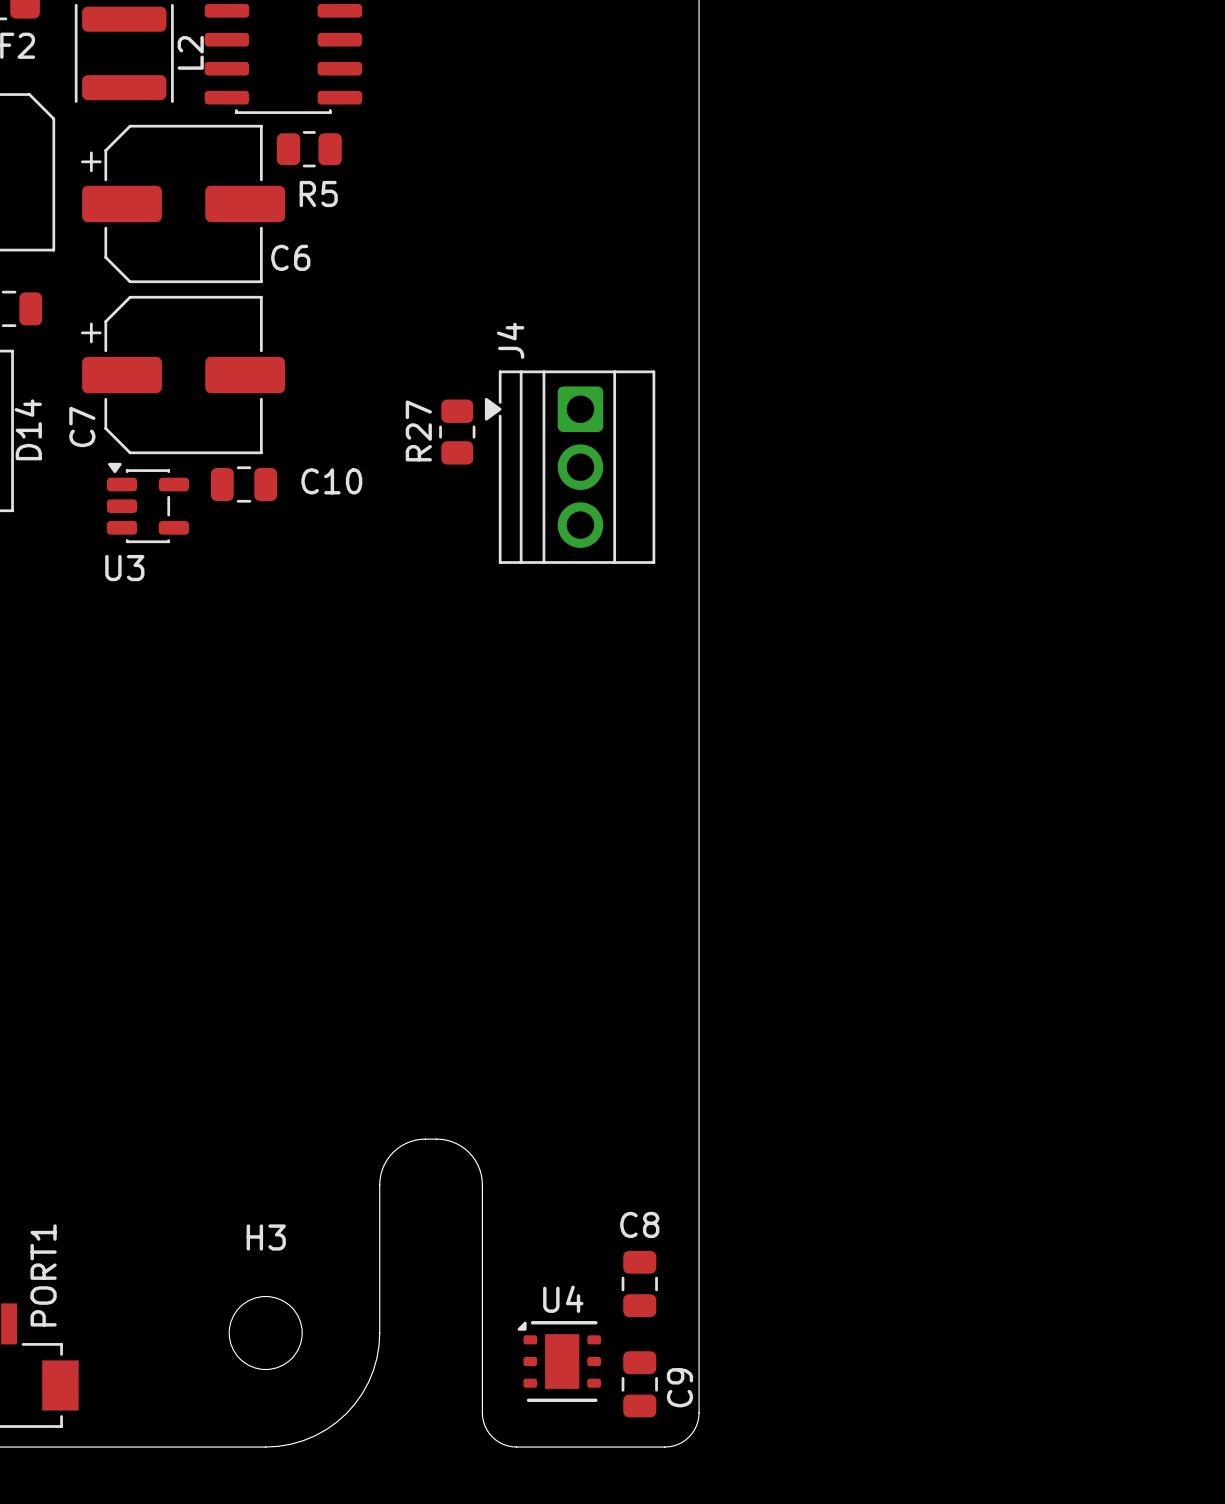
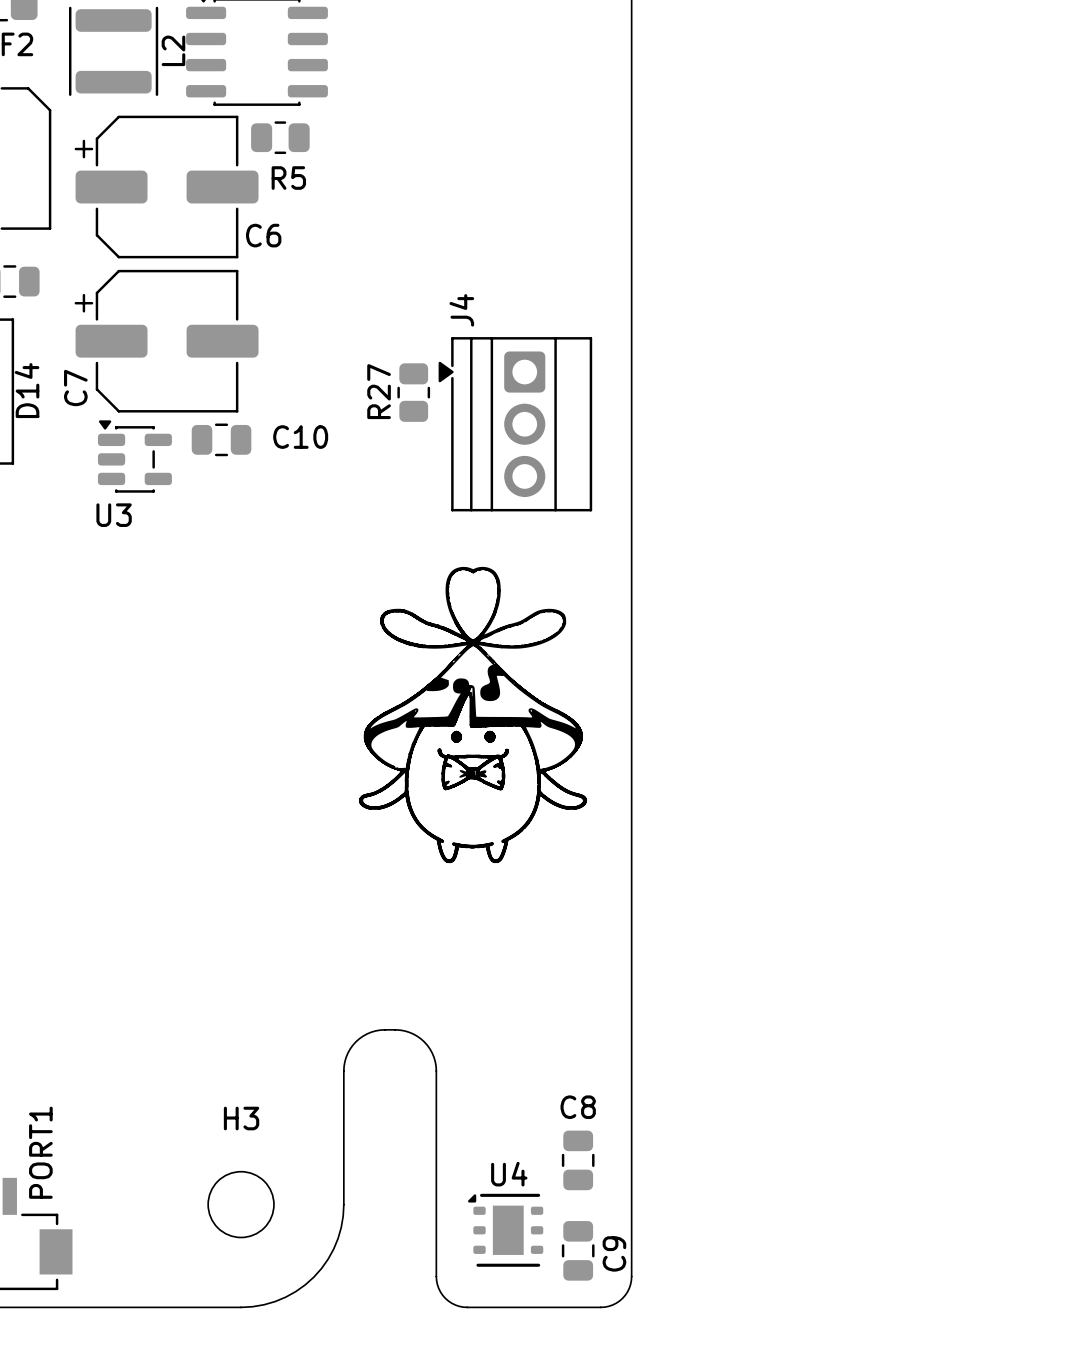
drawing: none -> [359, 566, 588, 864]

